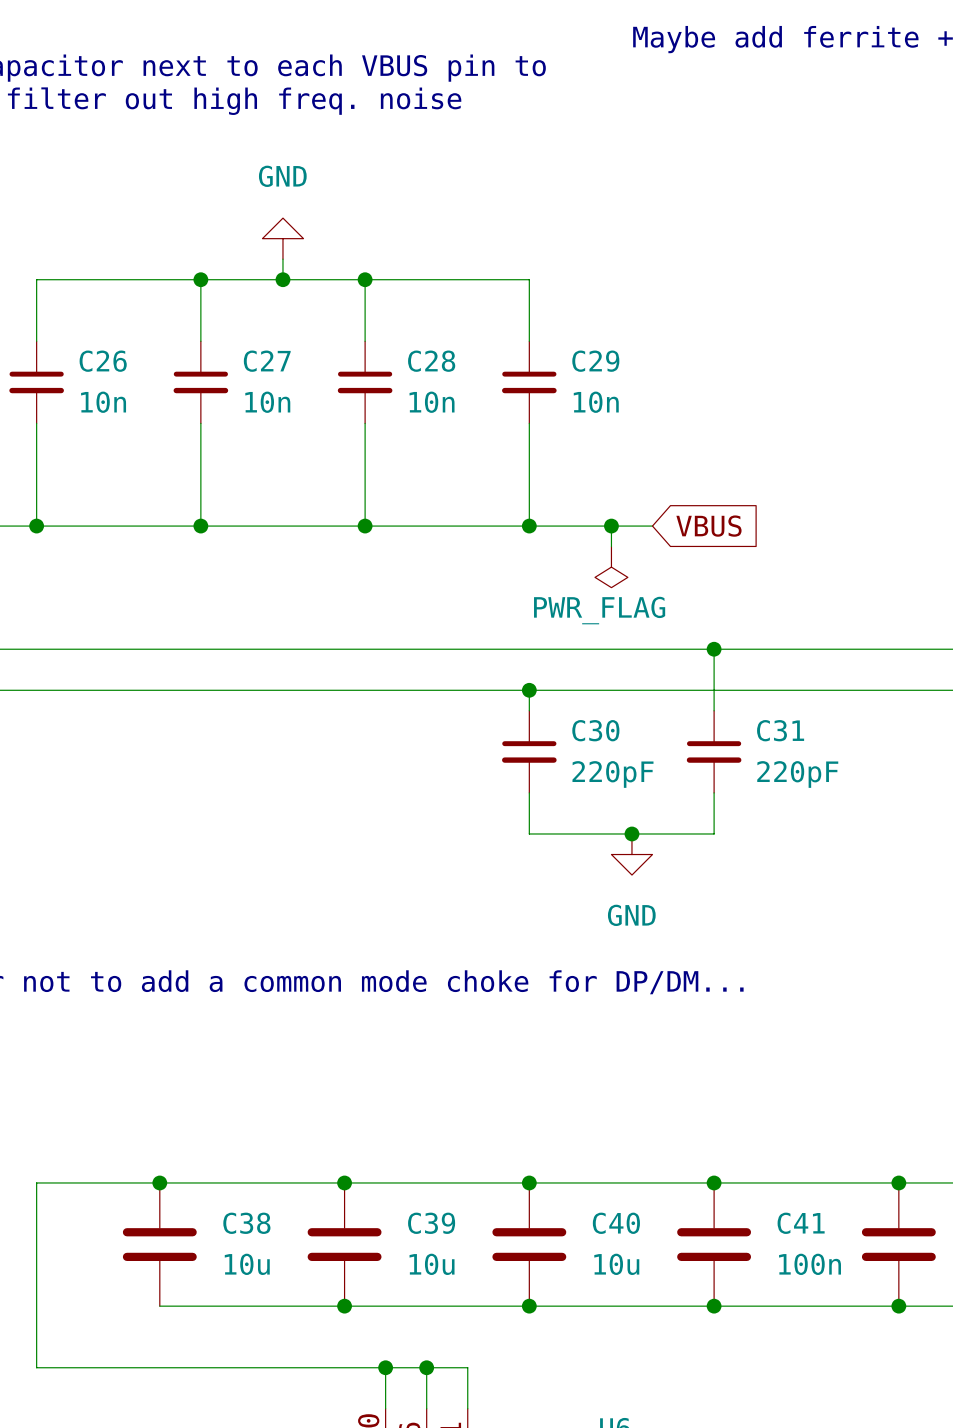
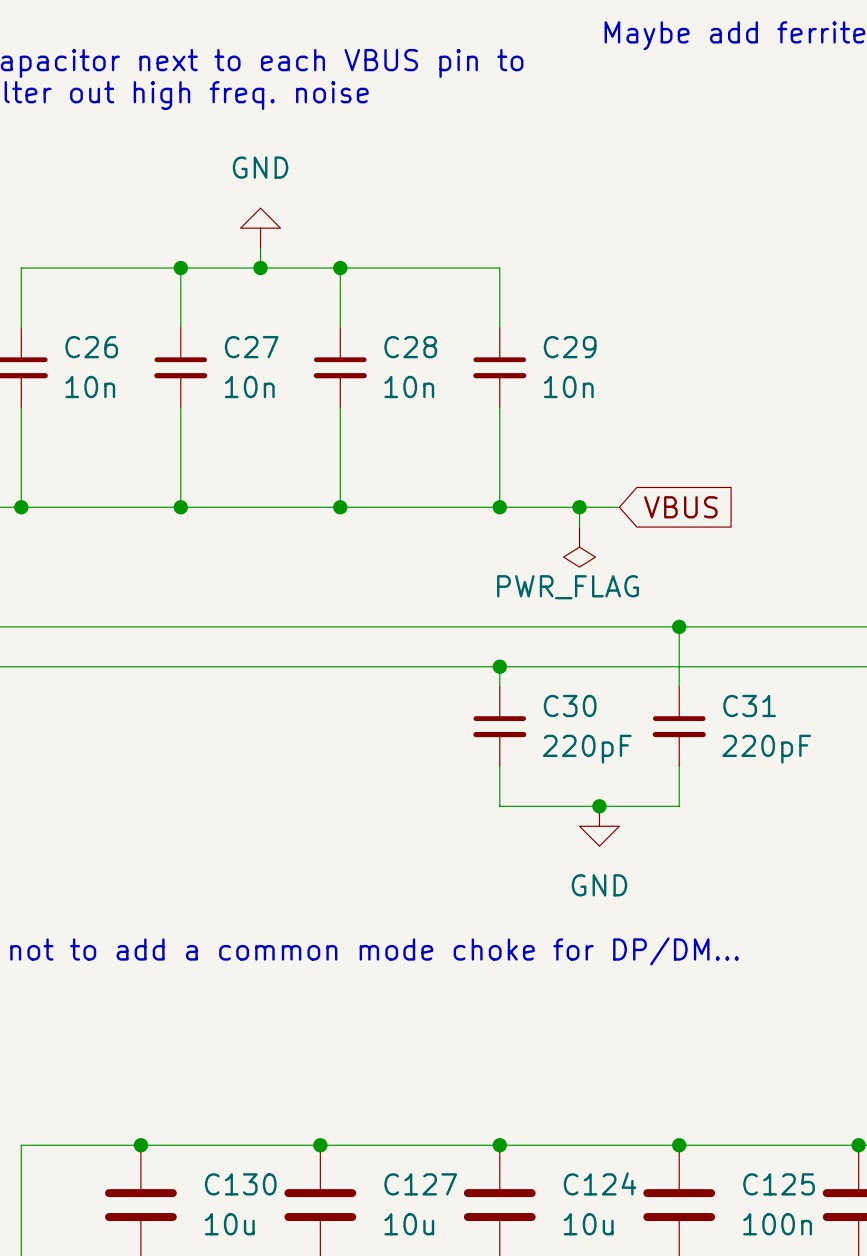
C38 name: C38 (246, 1223) -> C130 (240, 1184)
C39 name: C39 (431, 1223) -> C127 (420, 1184)
C40 name: C40 (616, 1223) -> C124 (600, 1183)
C41 name: C41 (801, 1223) -> C125 (779, 1184)

